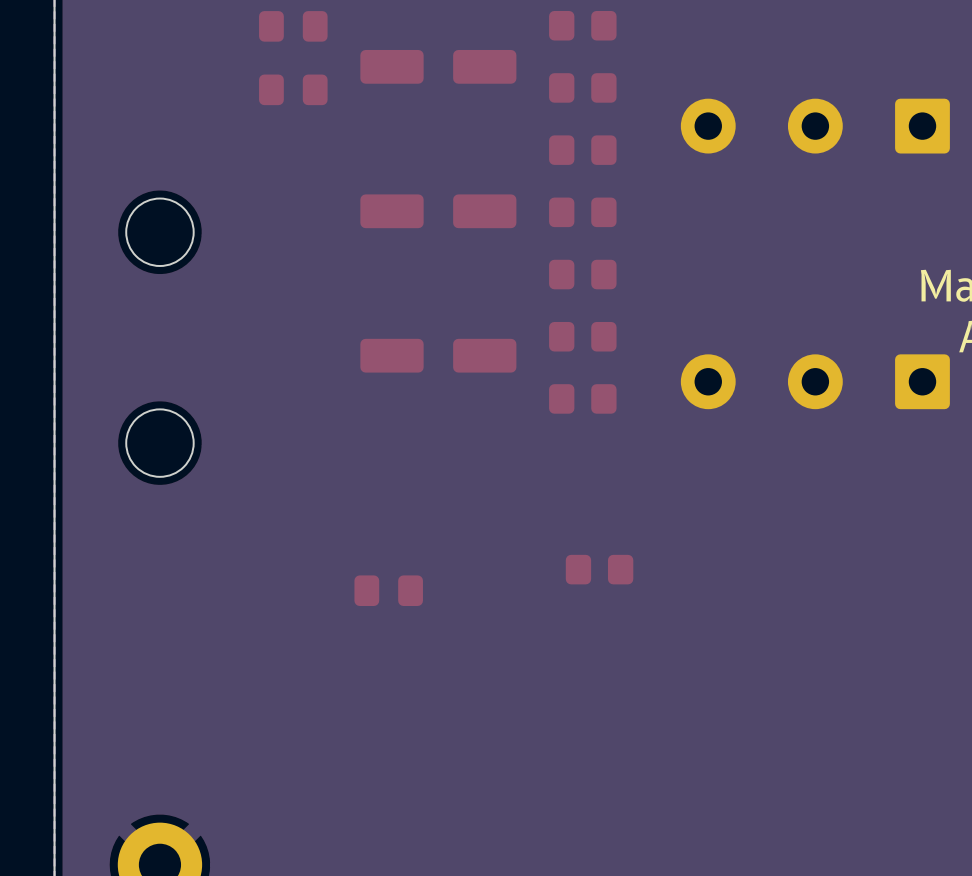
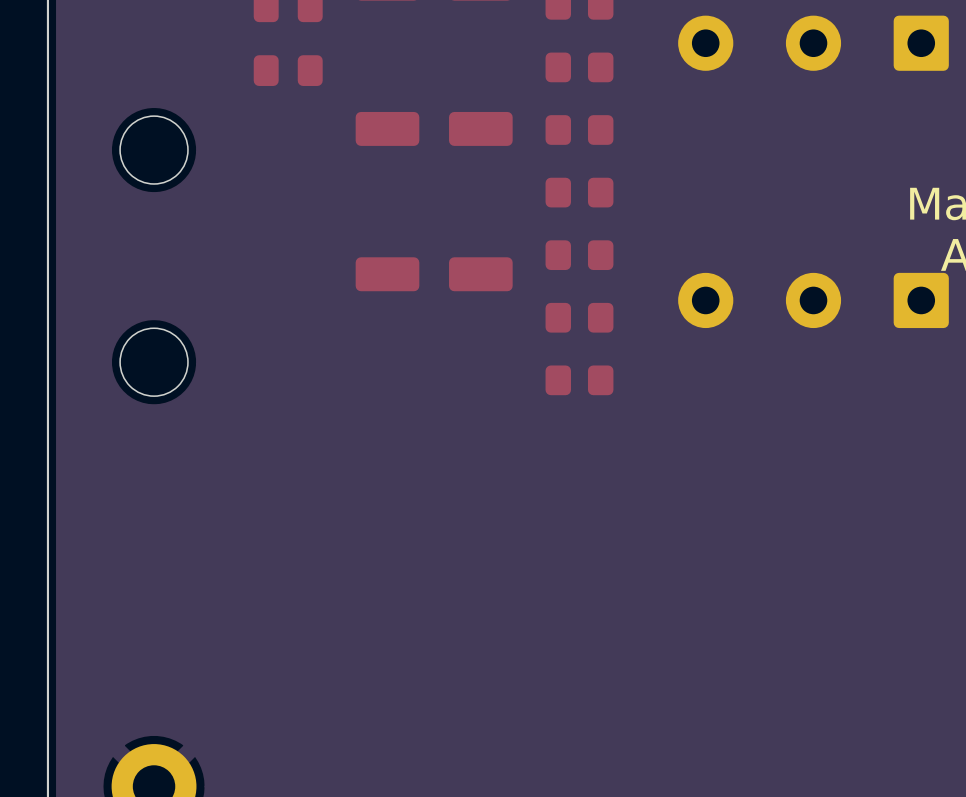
part position: (599, 569) -> (579, 380)
part position: (388, 590) -> (288, 70)

